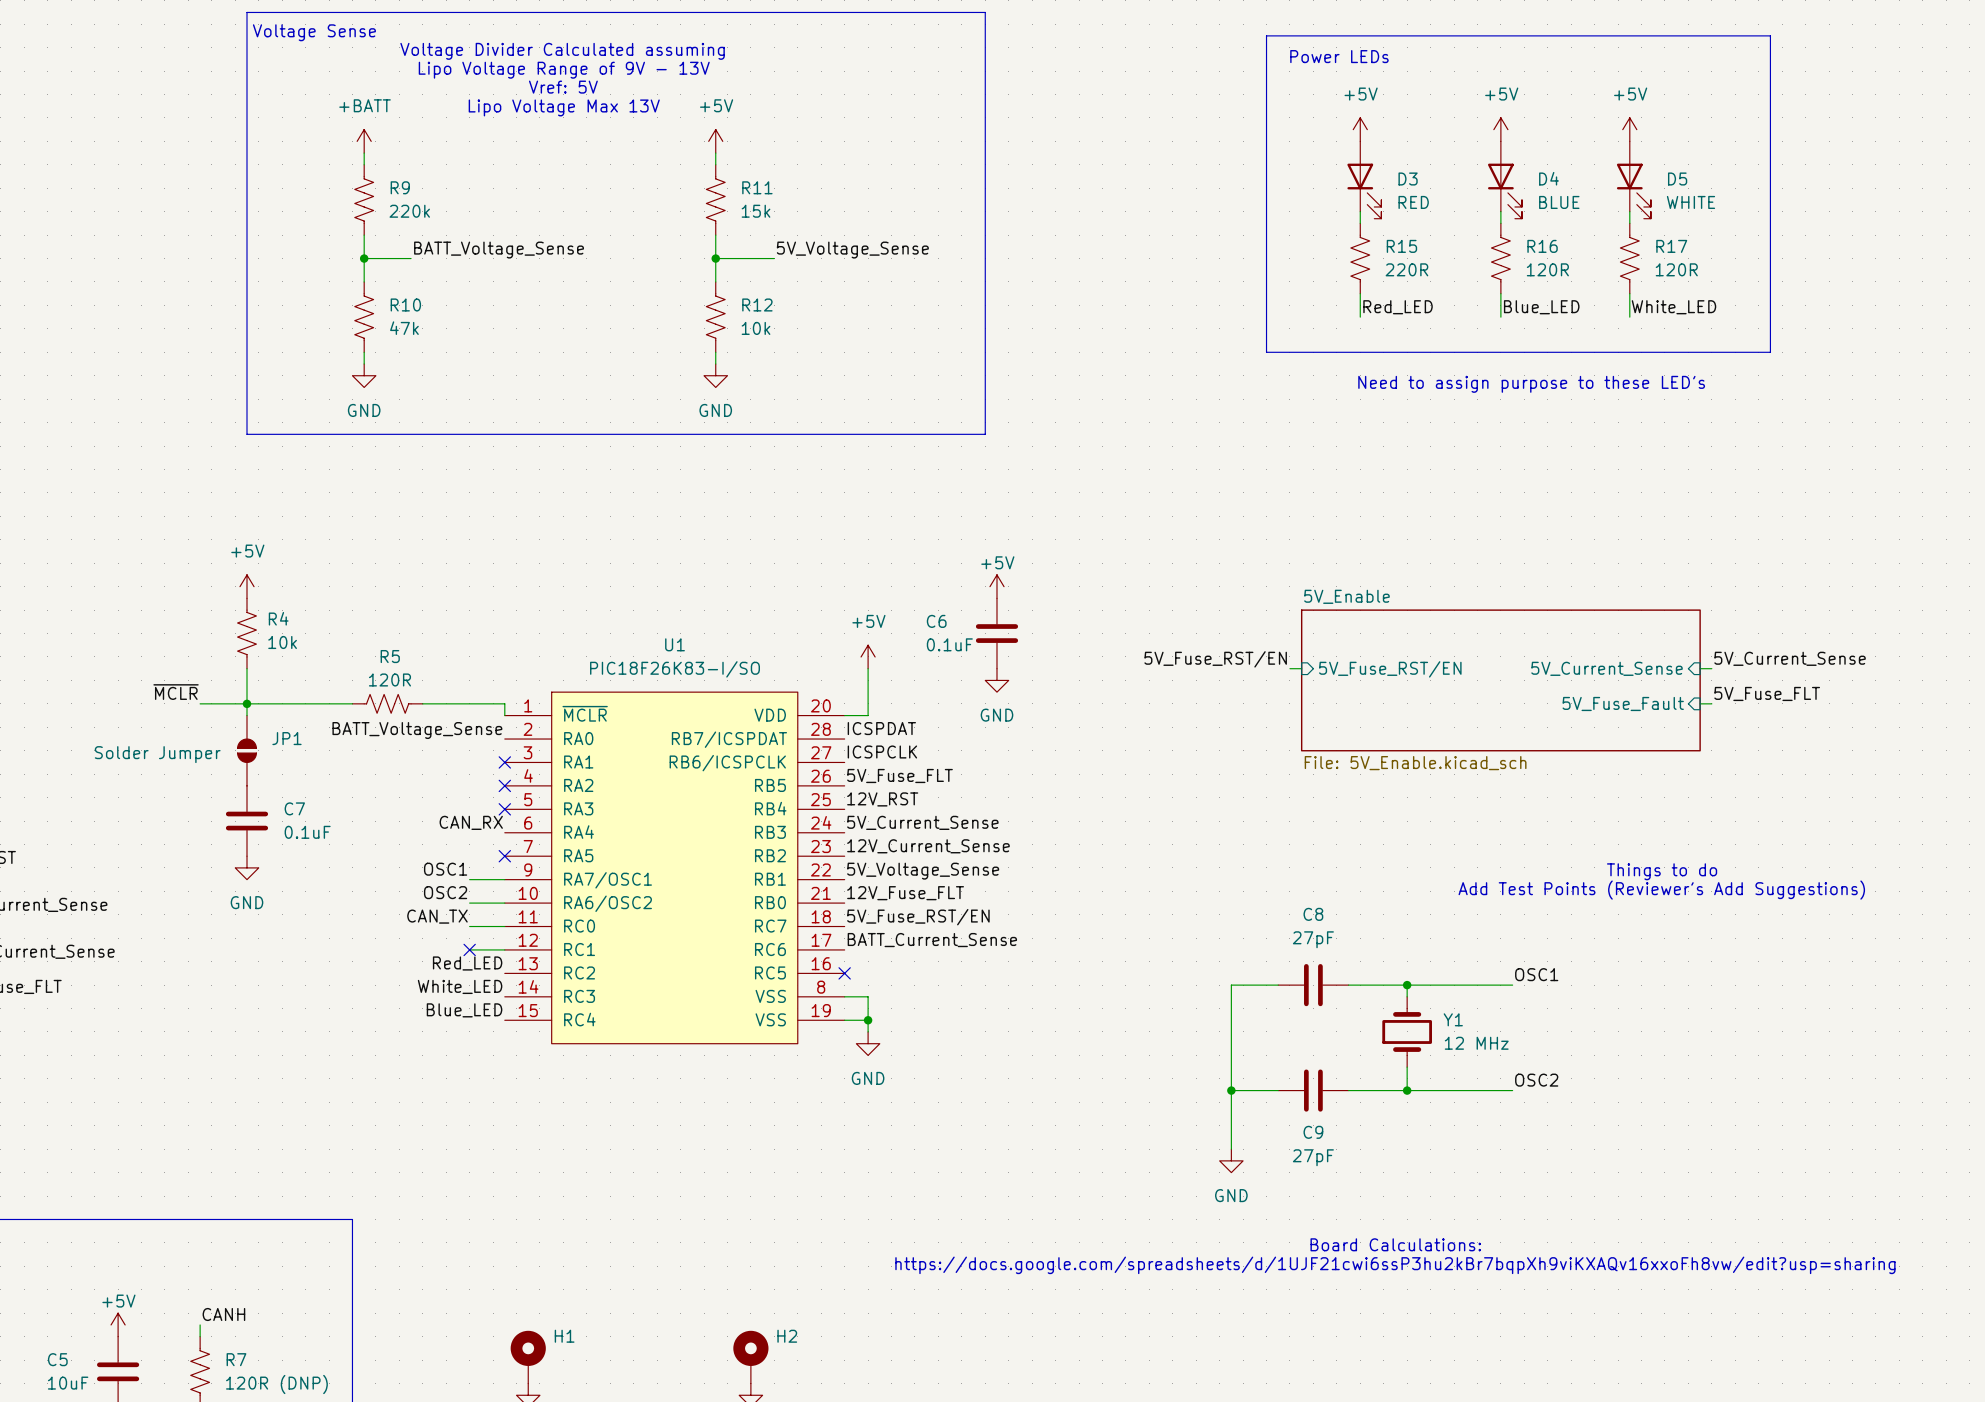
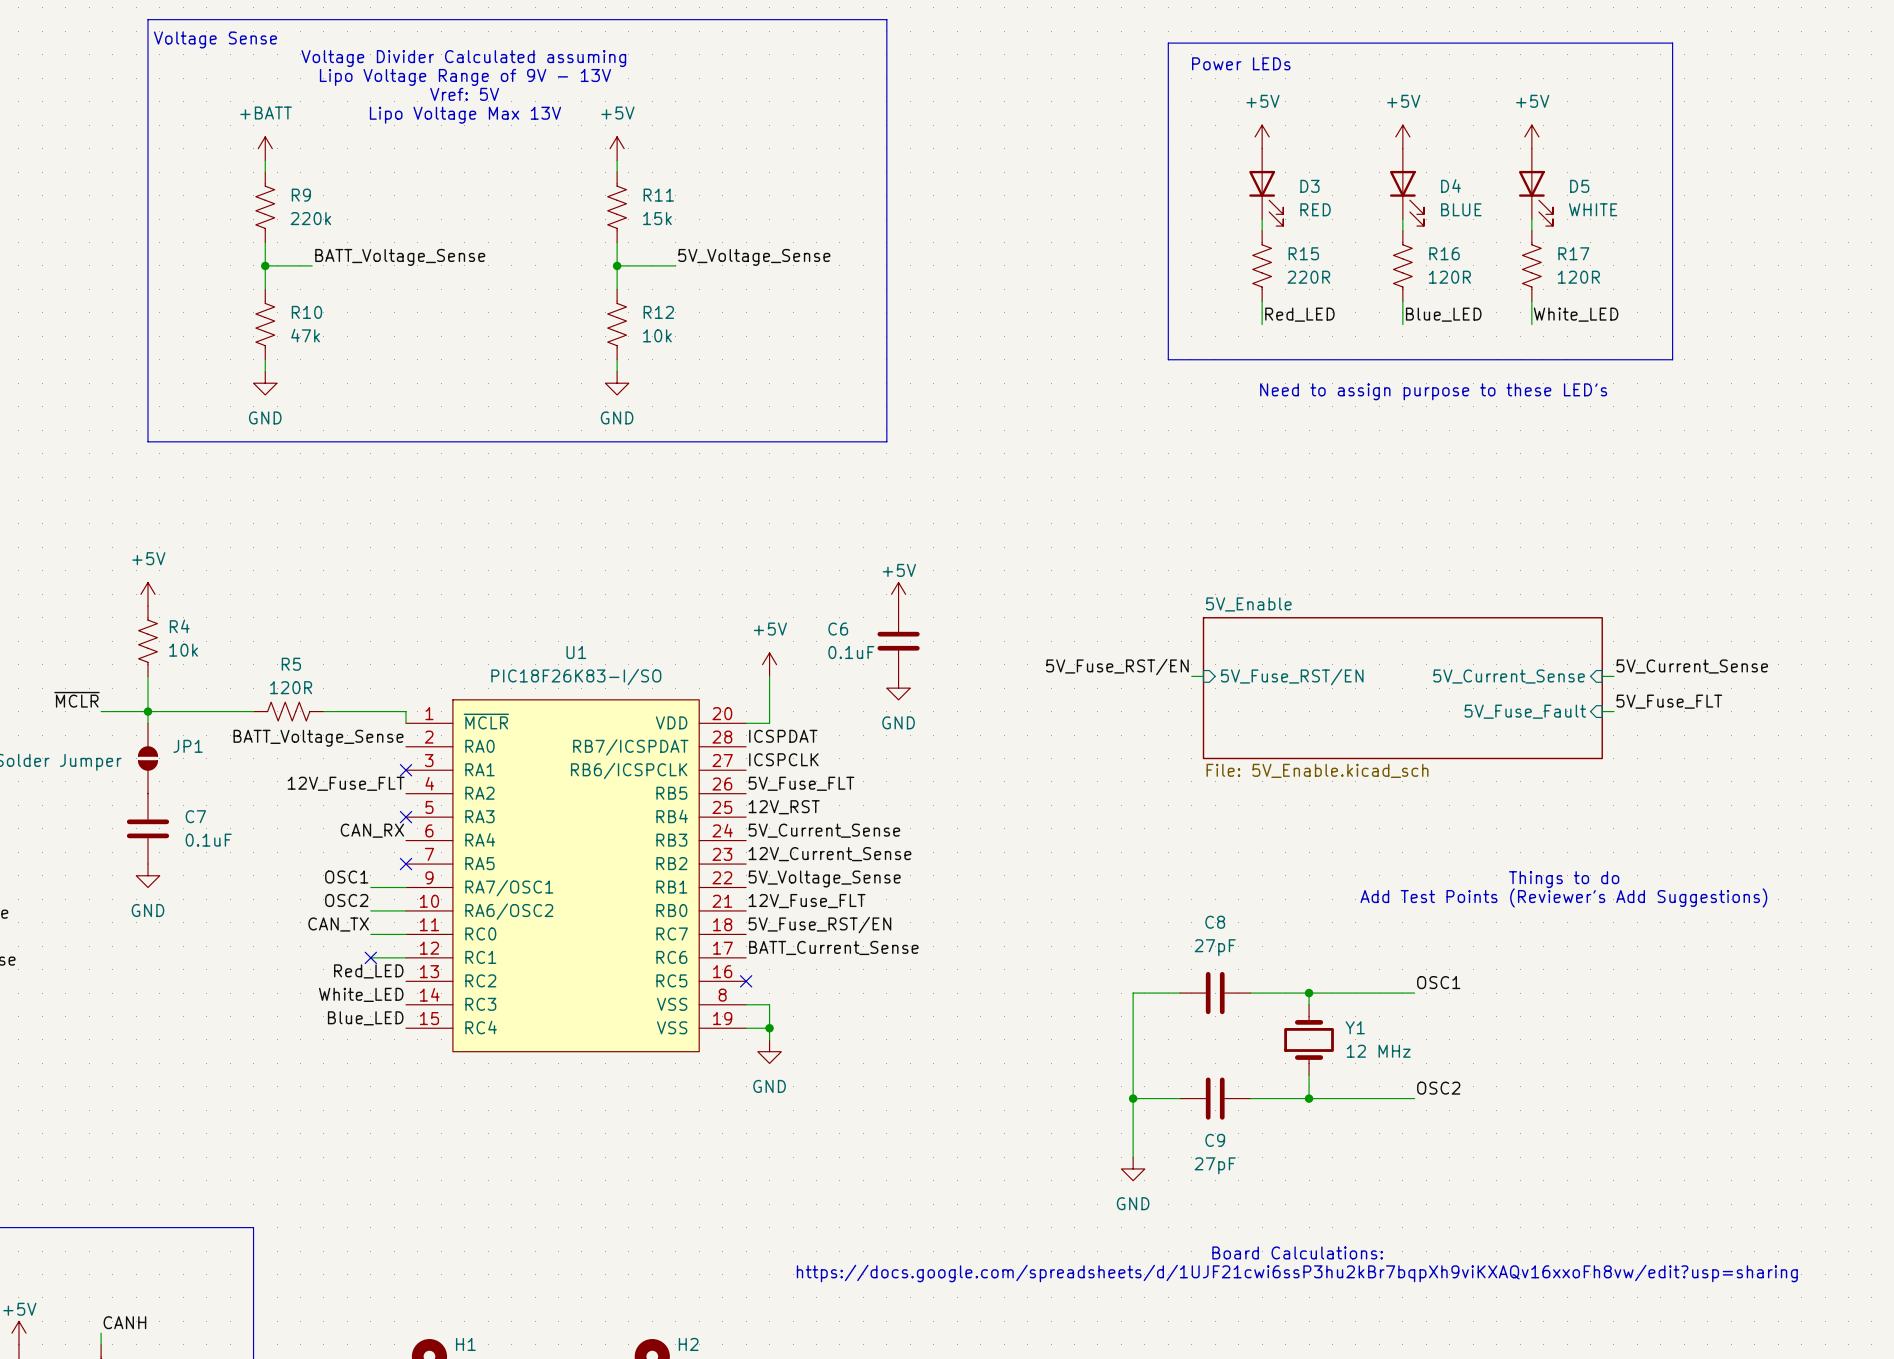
label: none -> 12V_Fuse_FLT (346, 783)
no-connect mark: (504, 785) -> none

